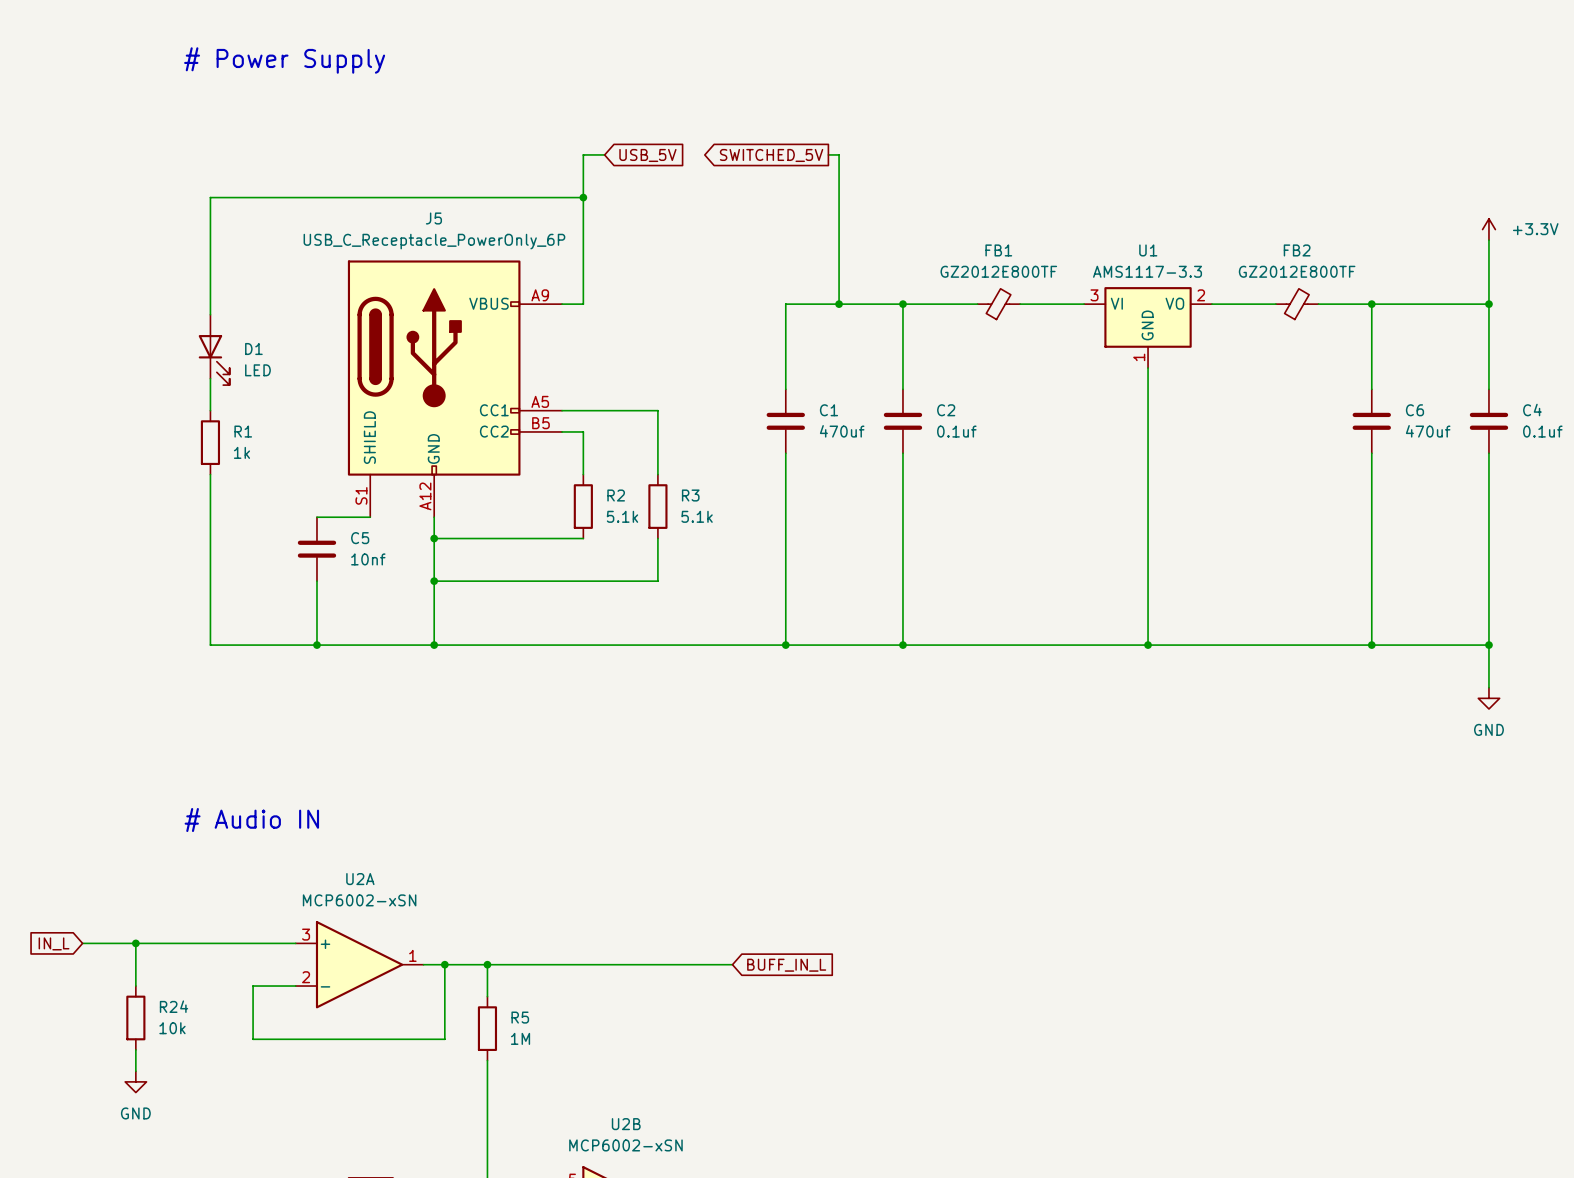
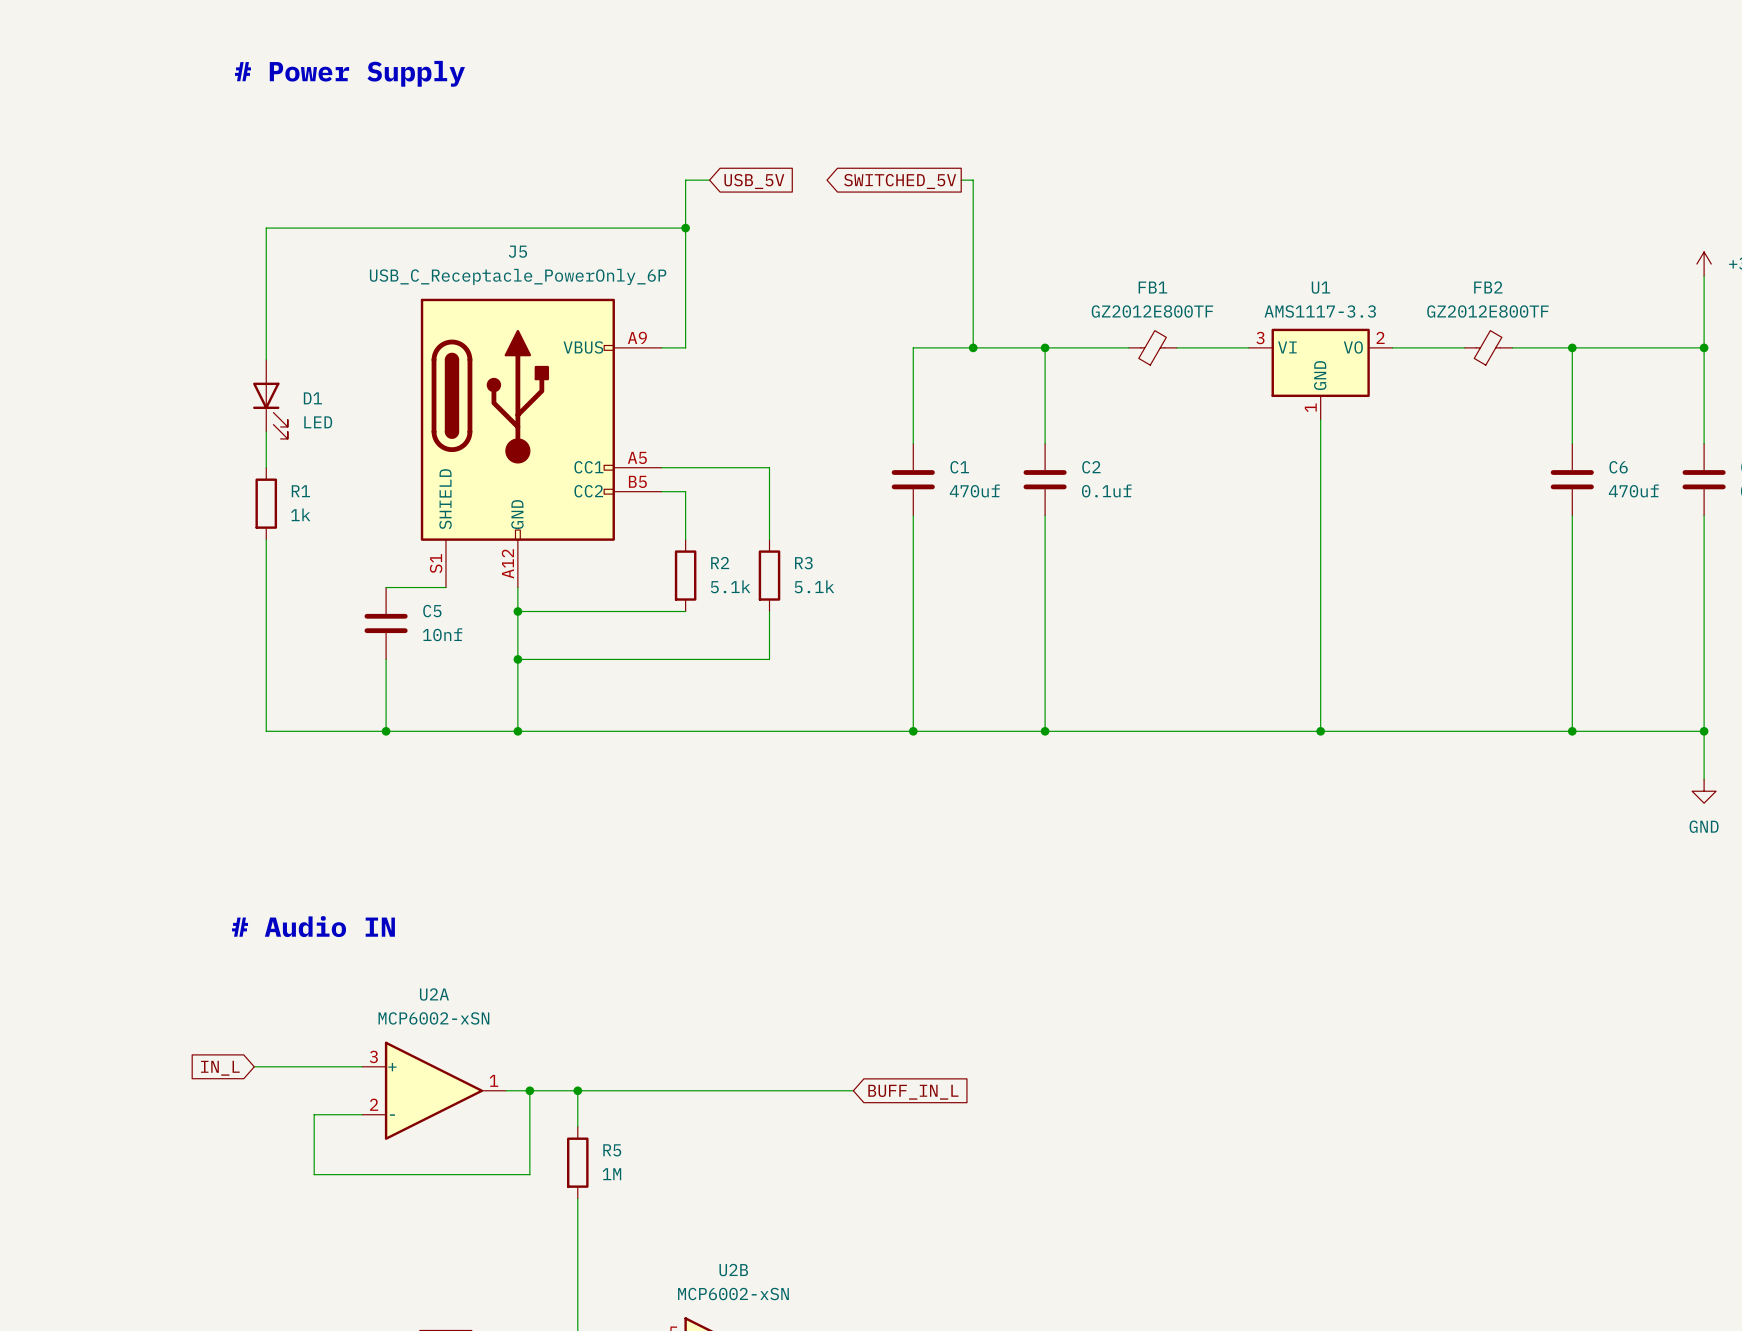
global label position: IN_L (54, 943) -> IN_L (220, 1068)
wire: (82, 943) (199, 943) -> none
wire: (135, 943) (135, 986) -> none
junction: (135, 943) -> none
R24: 10k (135, 1017) -> none
wire: (135, 1049) (135, 1071) -> none
power symbol: GND (135, 1081) -> none

